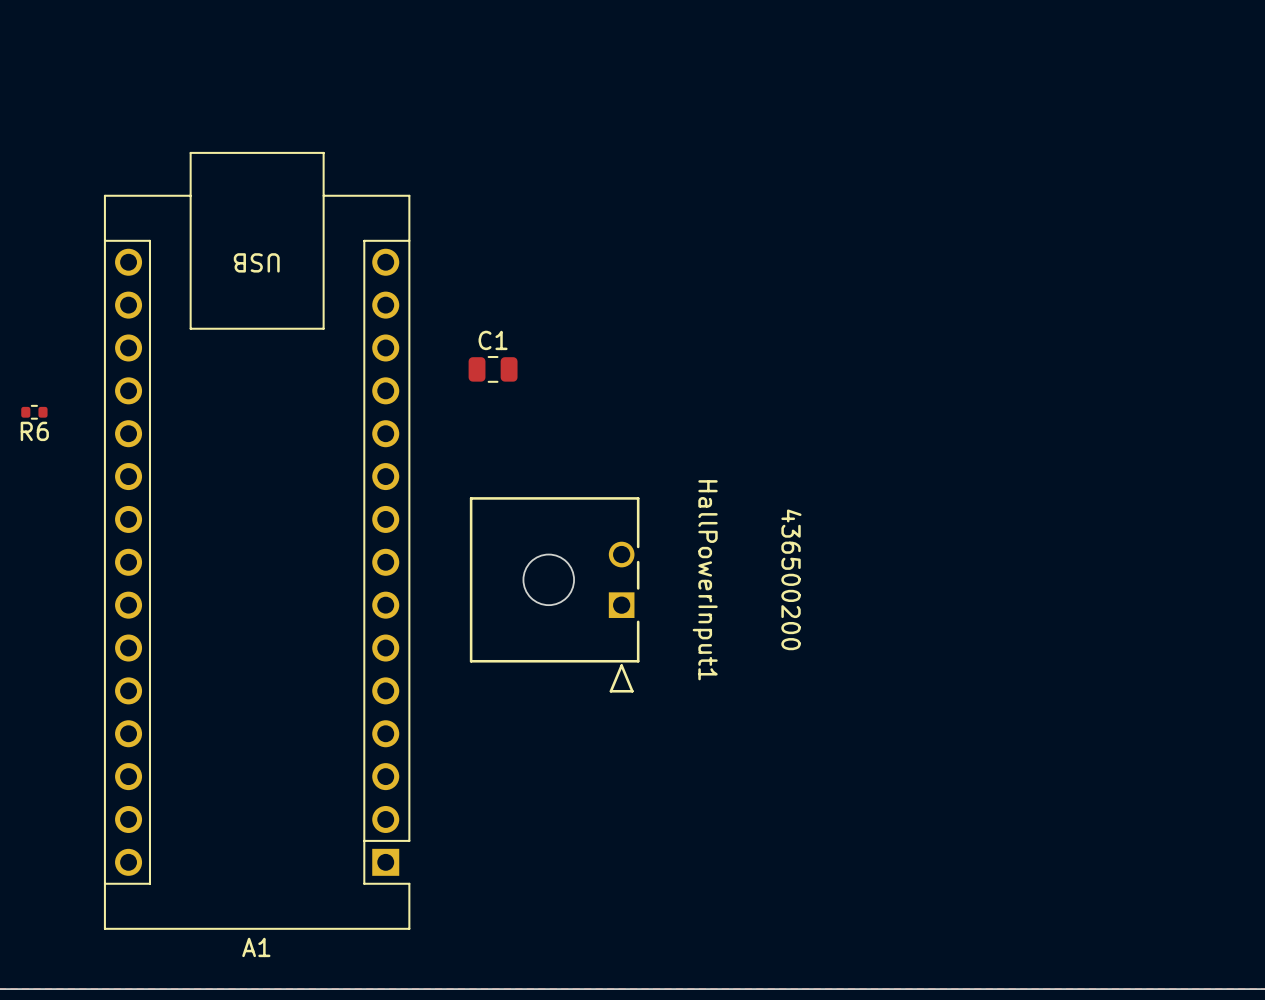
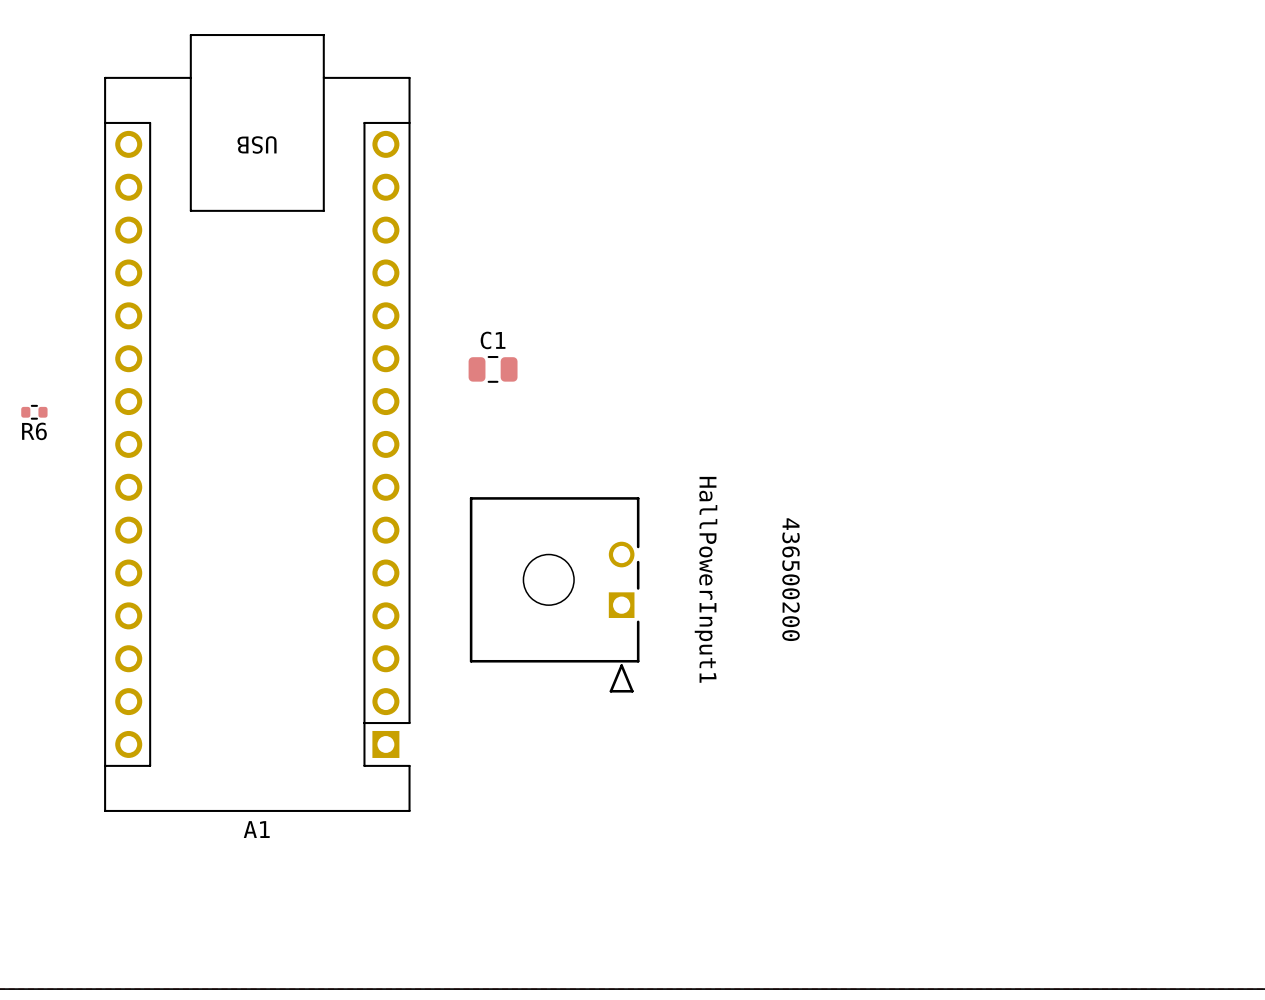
A1 position: (257, 540) -> (257, 422)

